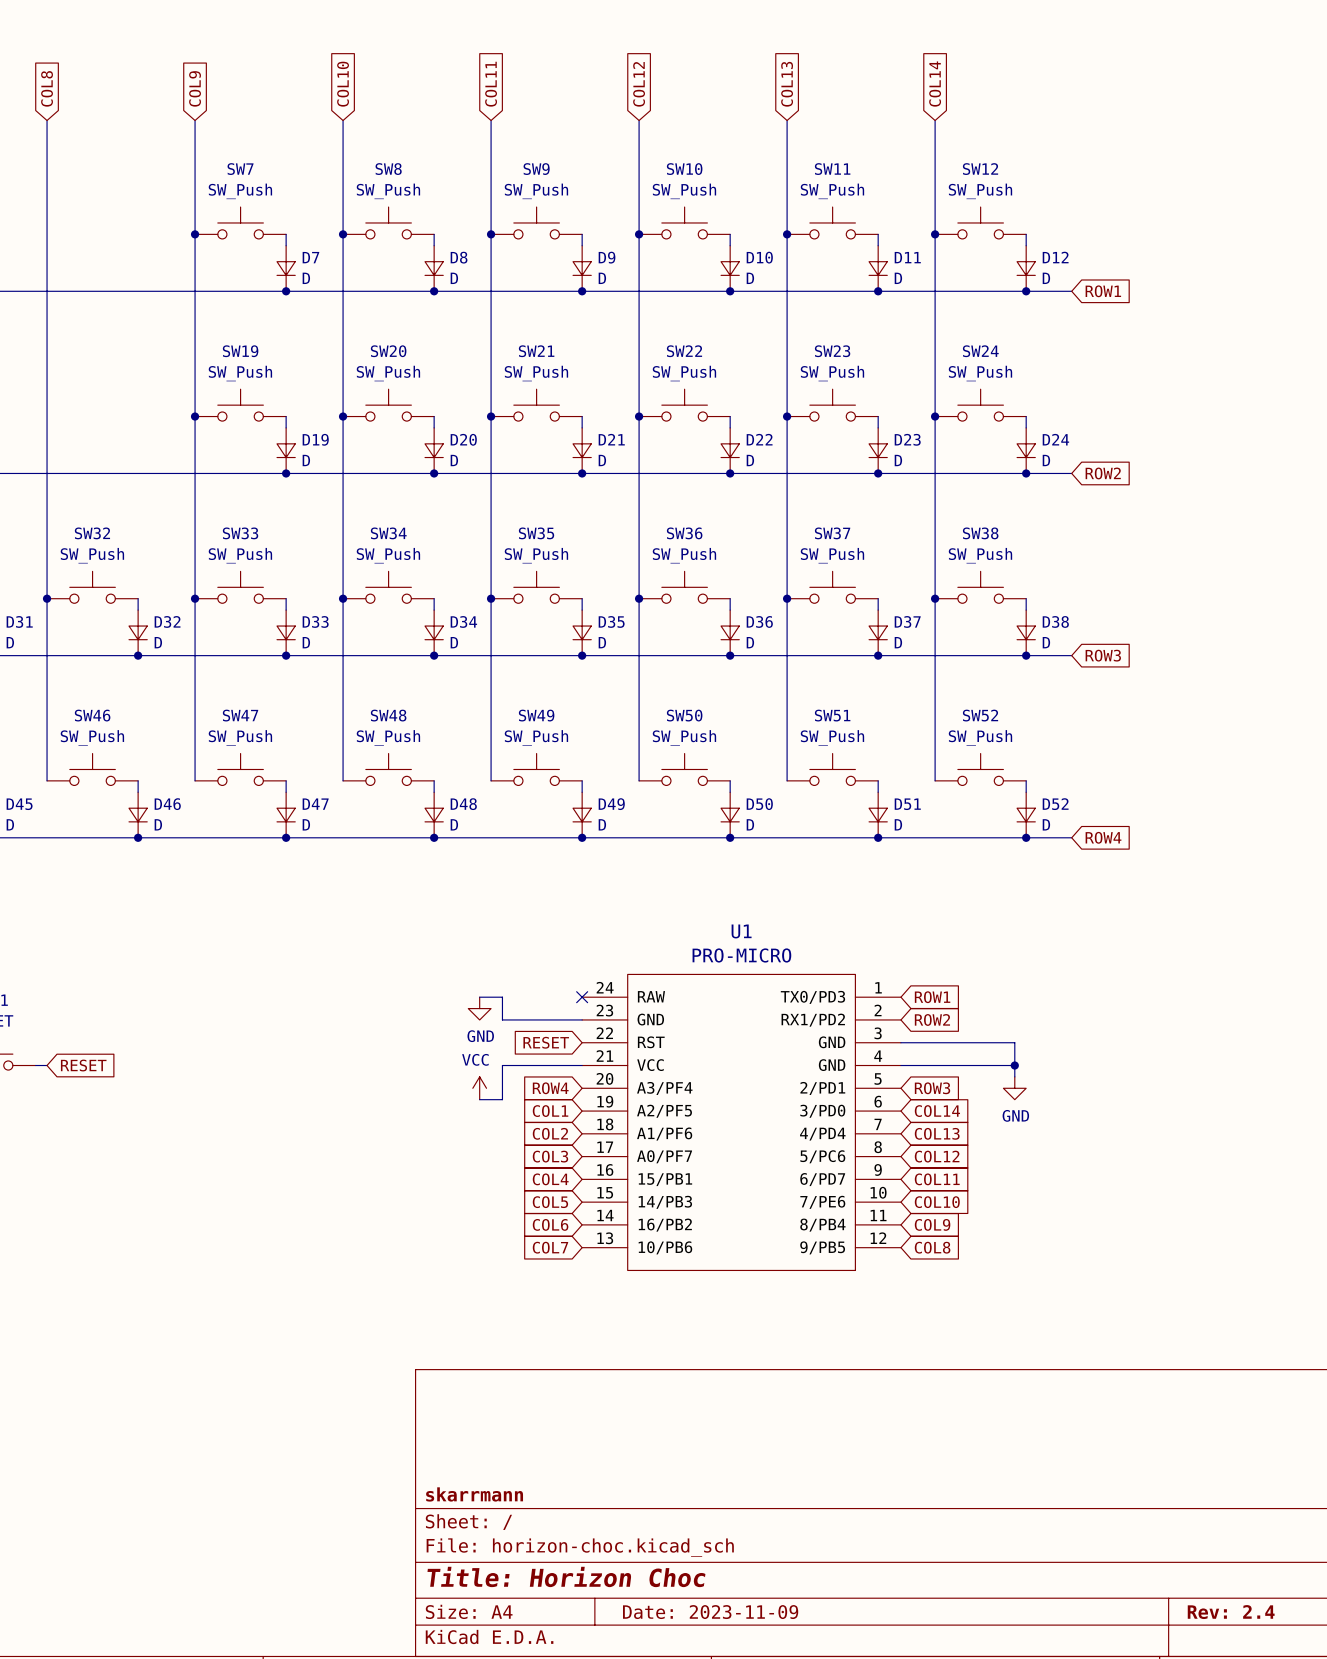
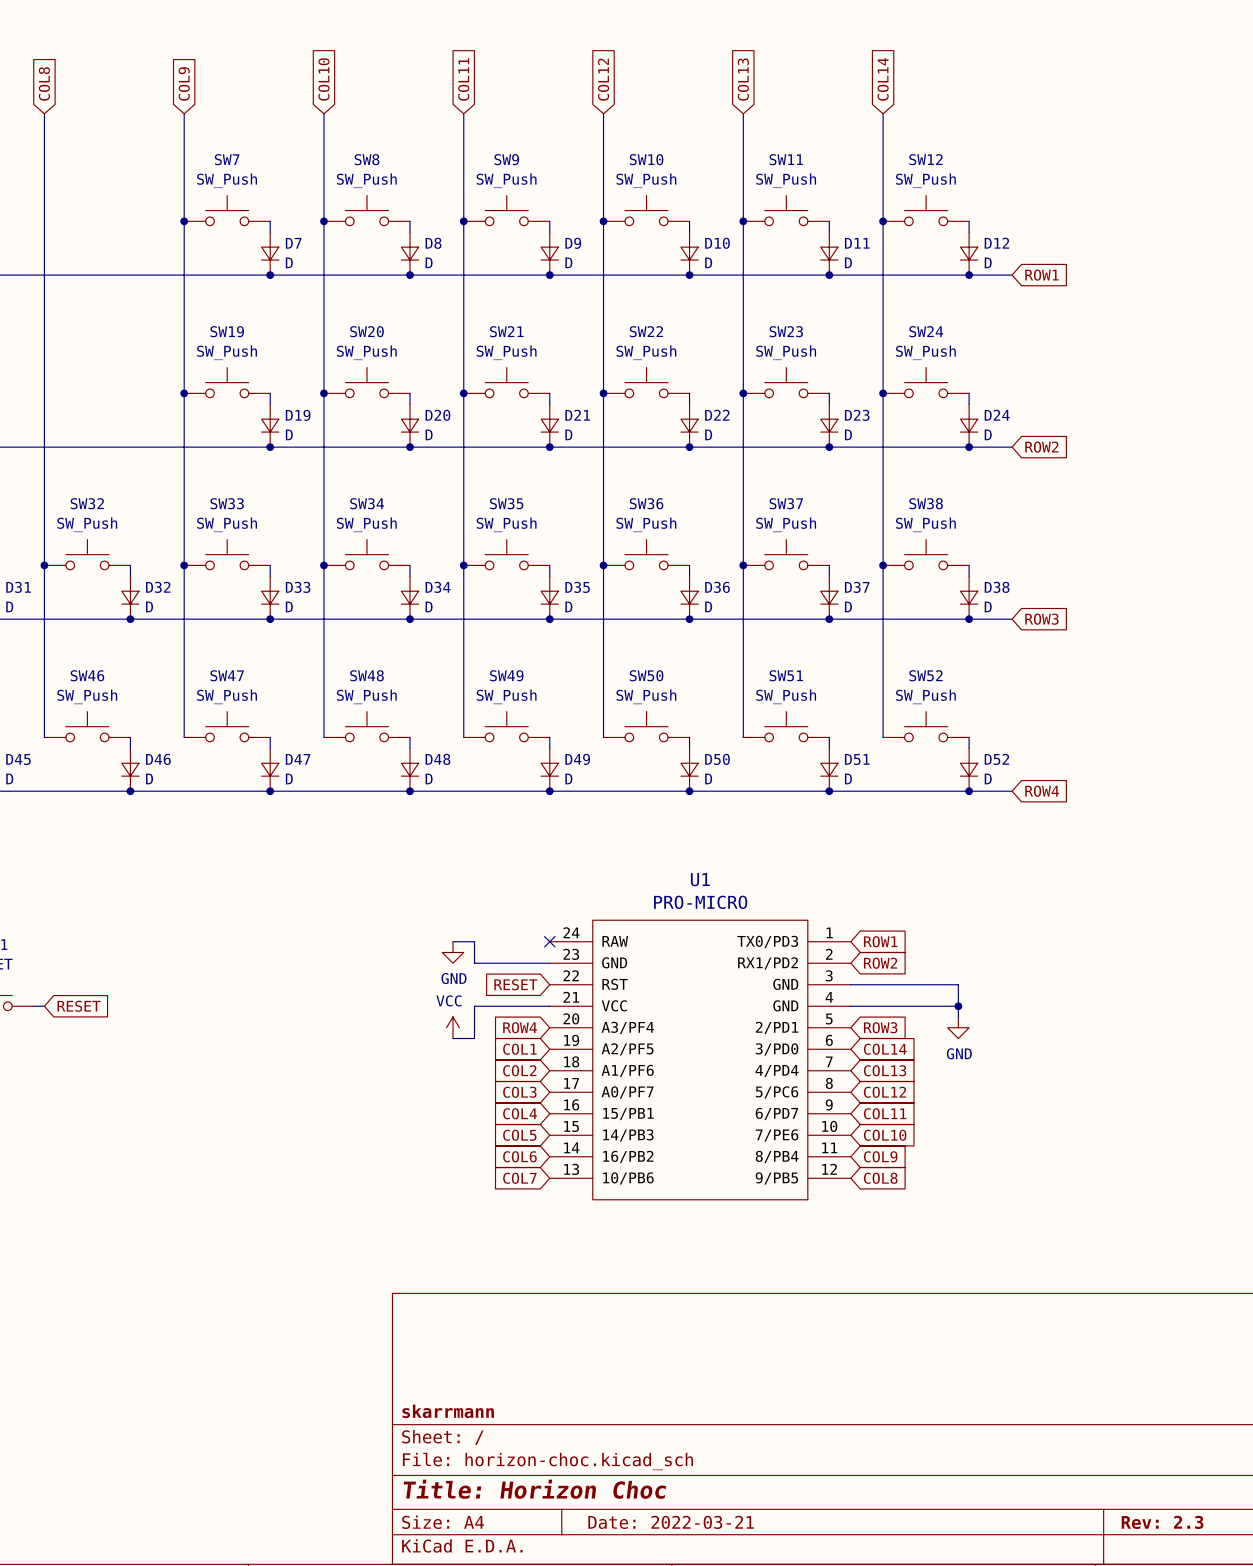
title block: Date: 2023-11-09 (710, 1612) -> Date: 2022-03-21 (671, 1522)
title block: Rev: 2.4 (1231, 1612) -> Rev: 2.3 (1162, 1522)

